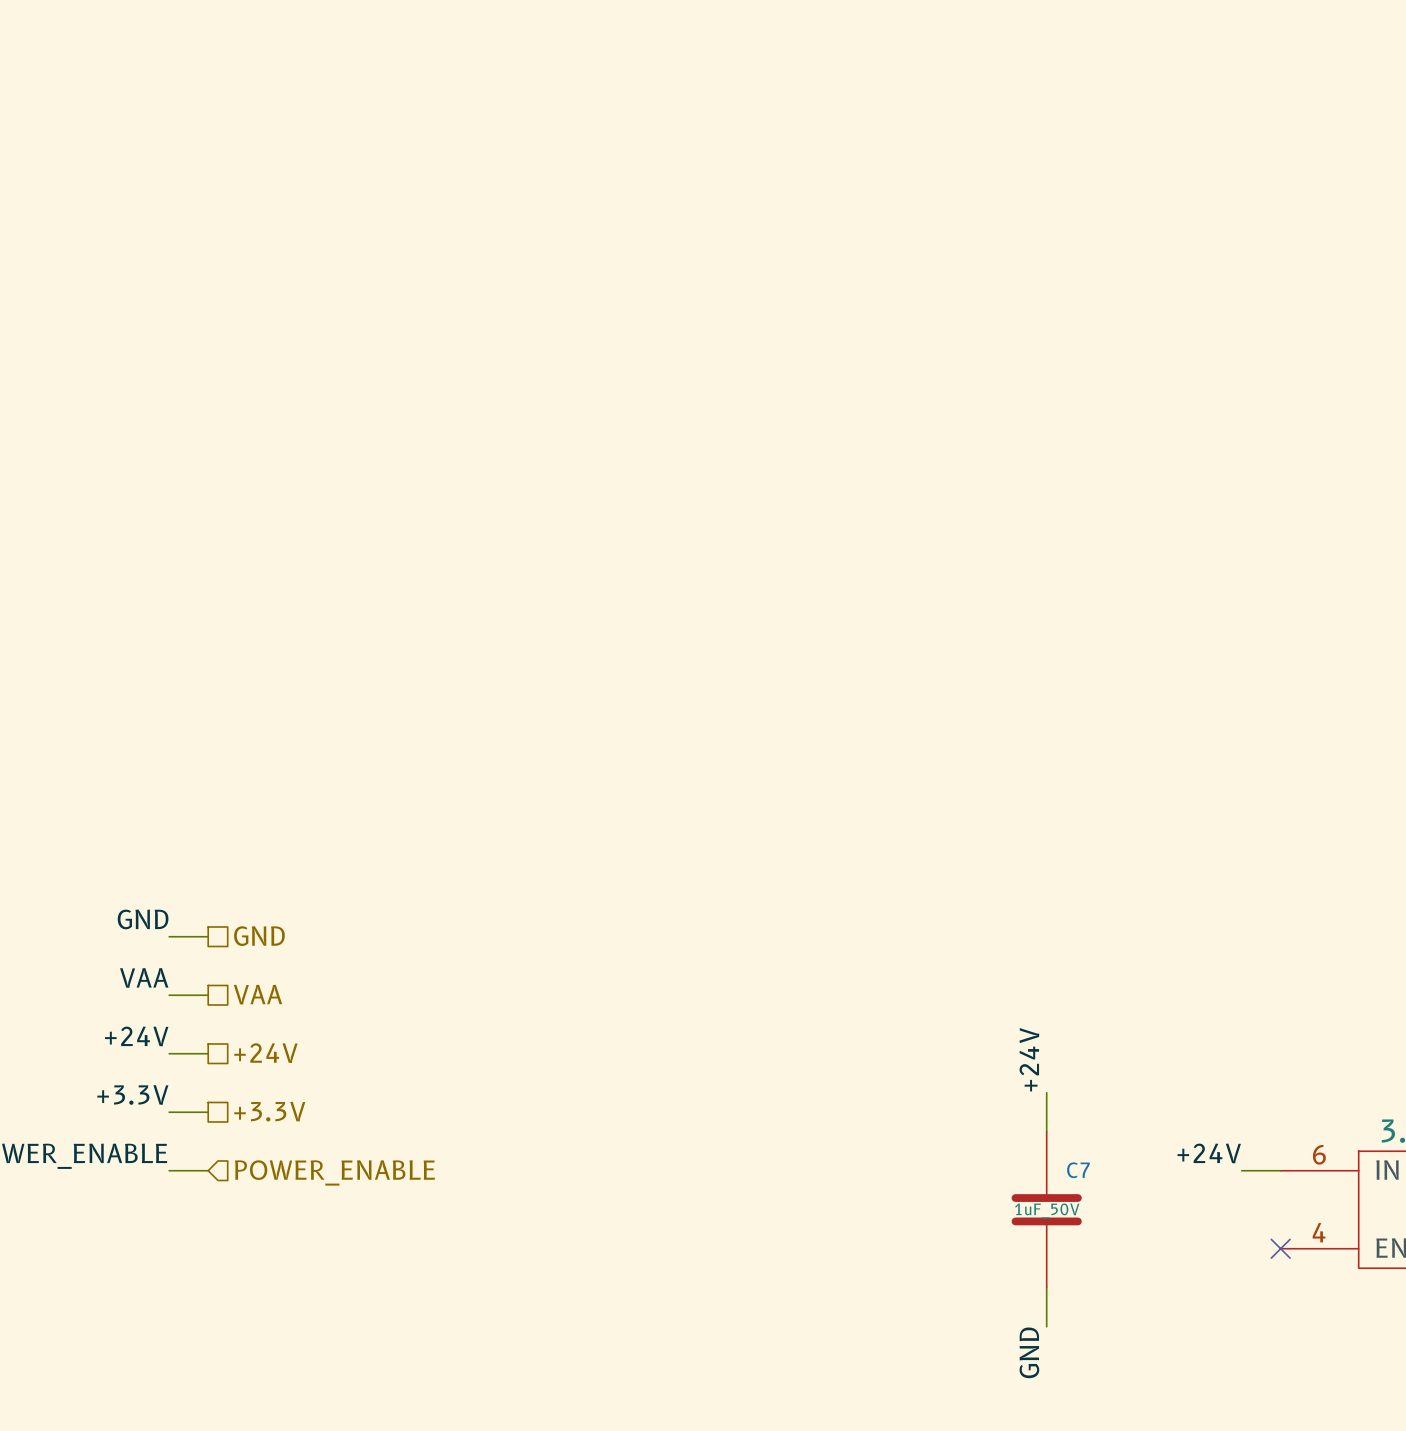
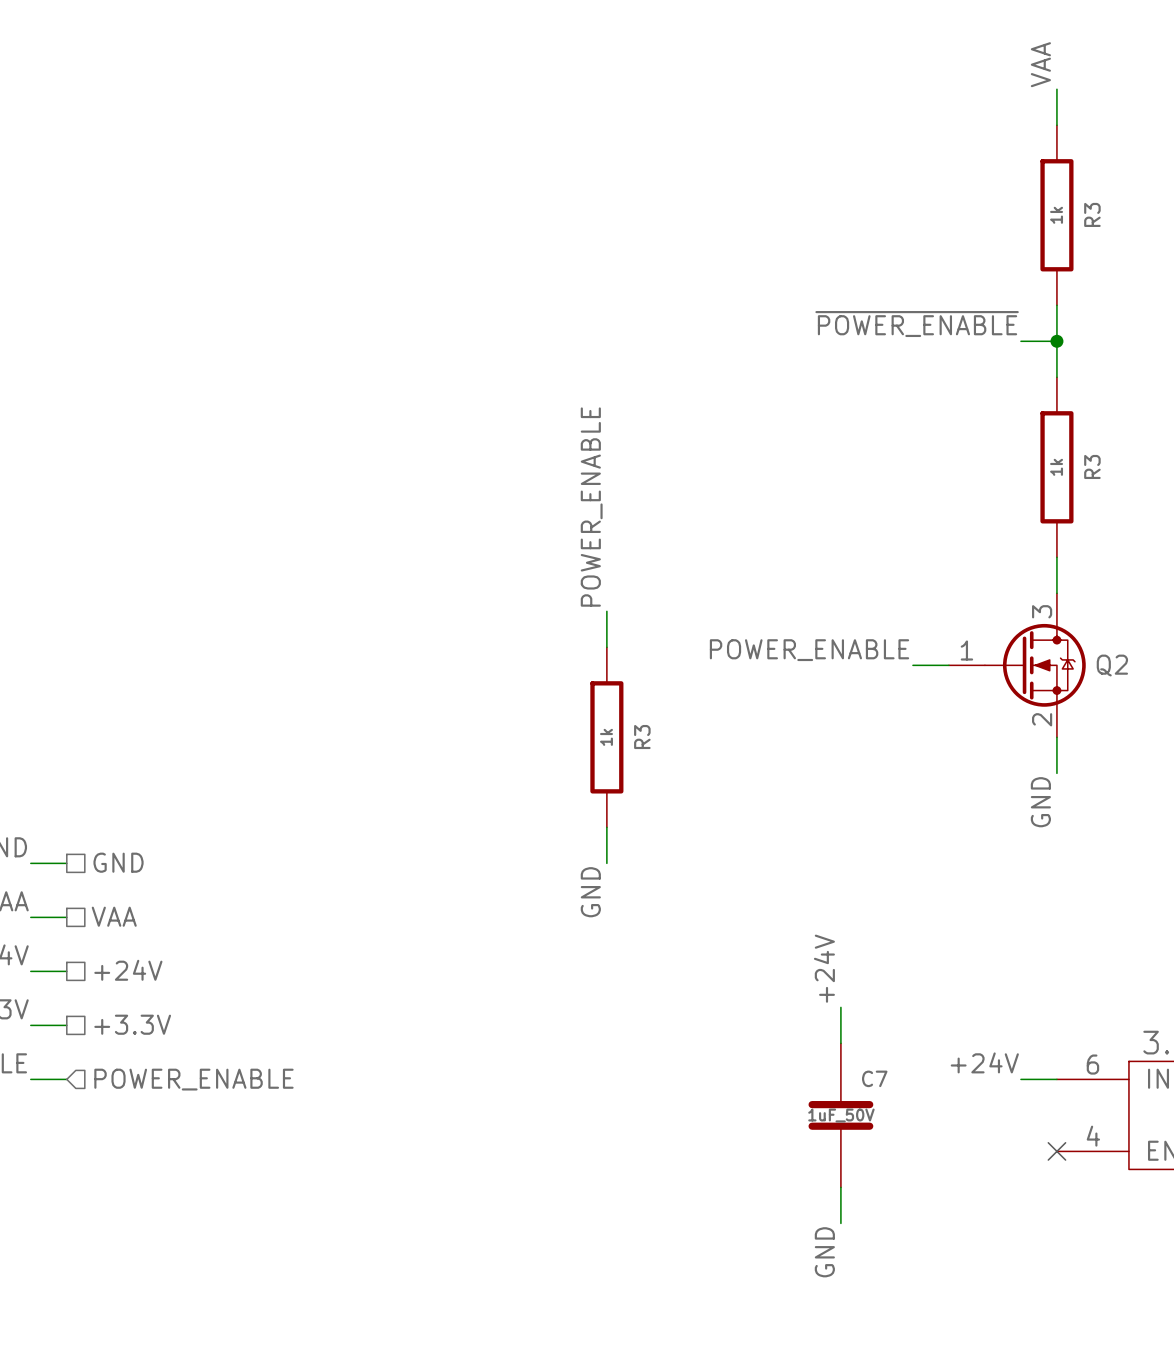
label: none -> VAA (1040, 64)
wire: none -> (1056, 89) (1056, 125)
R3: none -> 1k (1056, 215)
wire: none -> (1056, 305) (1056, 377)
label: none -> ~{POWER_ENABLE} (917, 324)
wire: none -> (1020, 341) (1056, 341)
junction: none -> (1056, 341)
R3: none -> 1k (1056, 467)
label: none -> POWER_ENABLE (591, 507)
wire: none -> (1056, 557) (1056, 593)
wire: none -> (606, 611) (606, 647)
label: none -> POWER_ENABLE (809, 650)
wire: none -> (912, 665) (948, 665)
Q2: none -> (1017, 665)
R3: none -> 1k (606, 737)
wire: none -> (1056, 737) (1056, 773)
label: none -> GND (1040, 802)
wire: none -> (606, 827) (606, 863)
label: none -> GND (590, 892)

